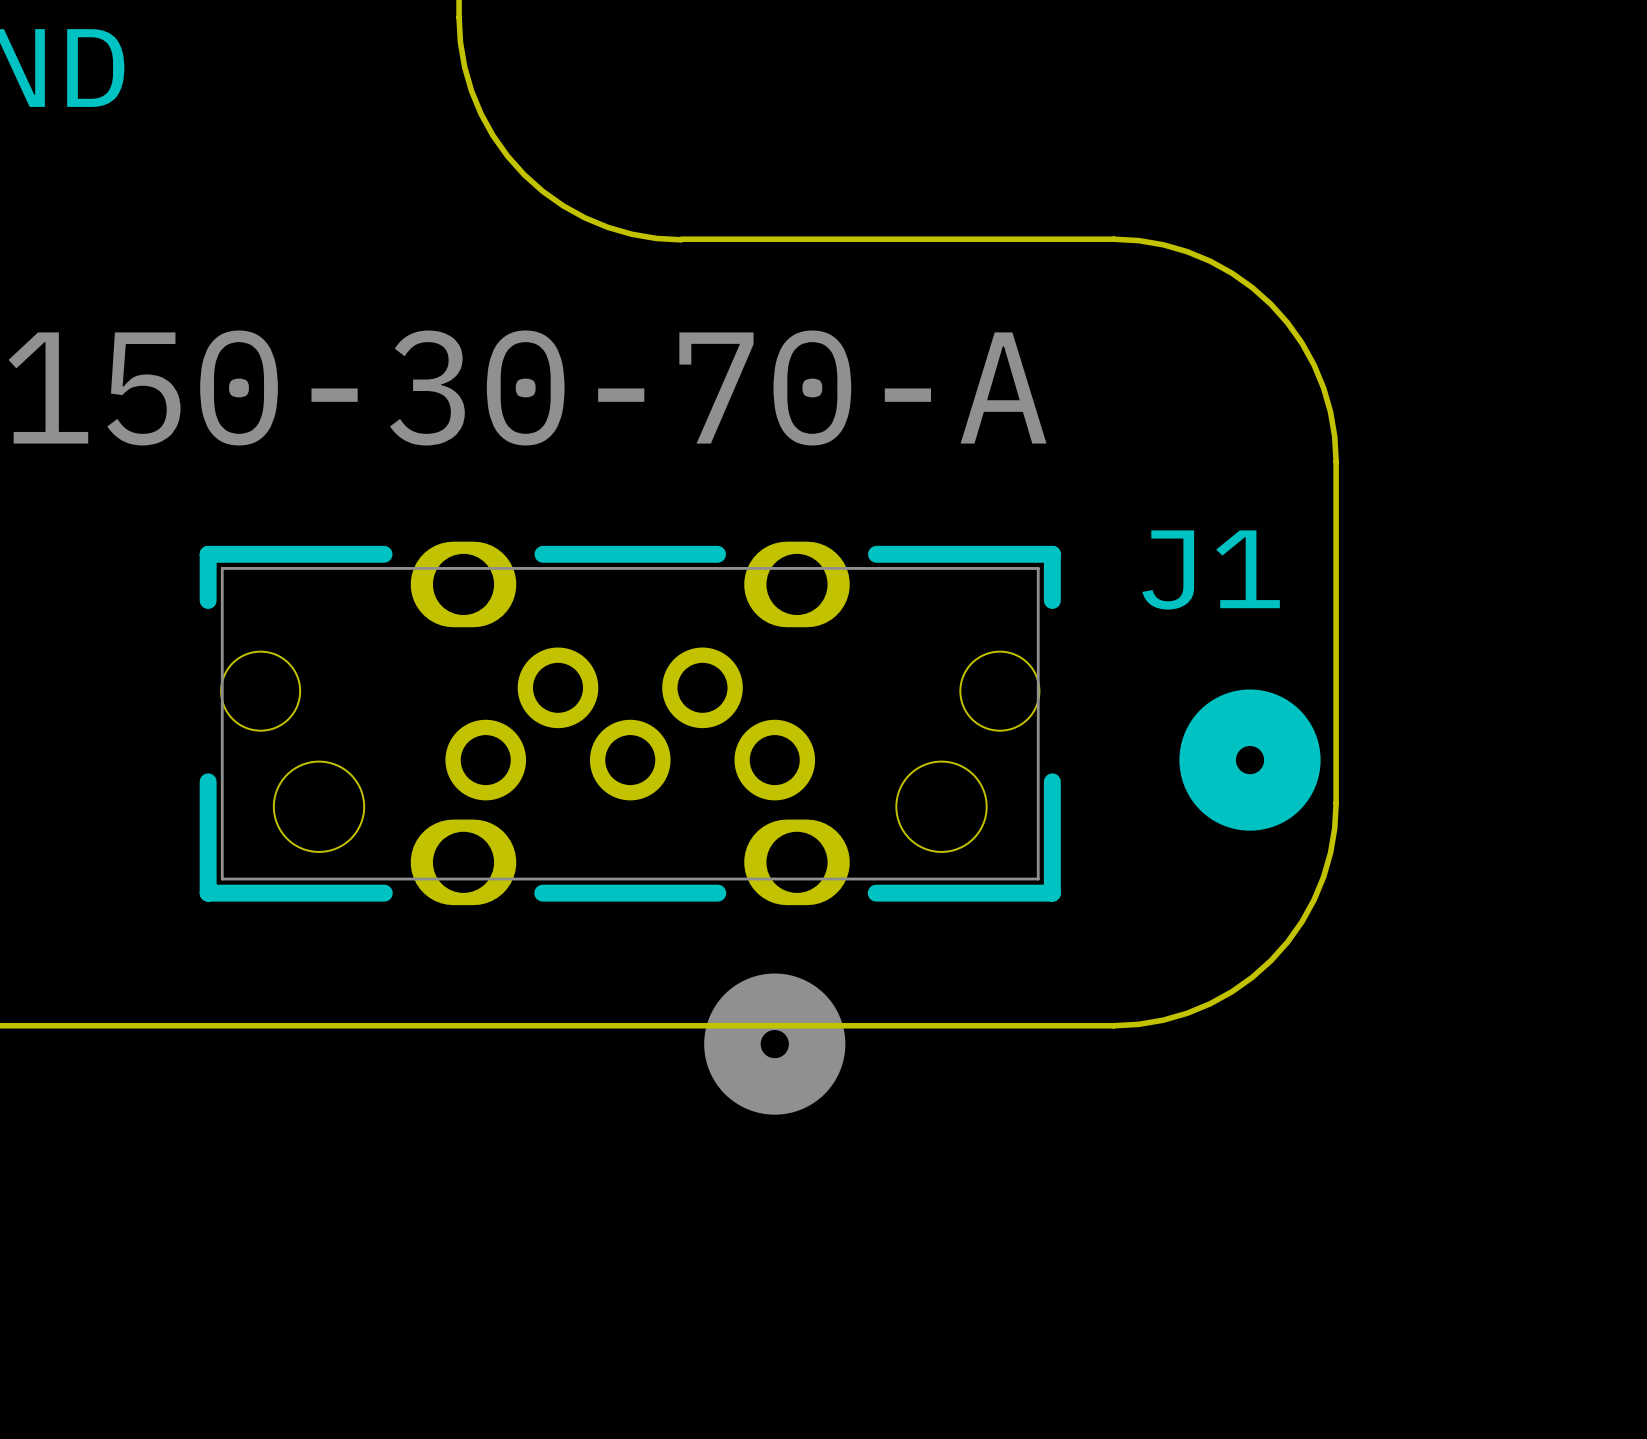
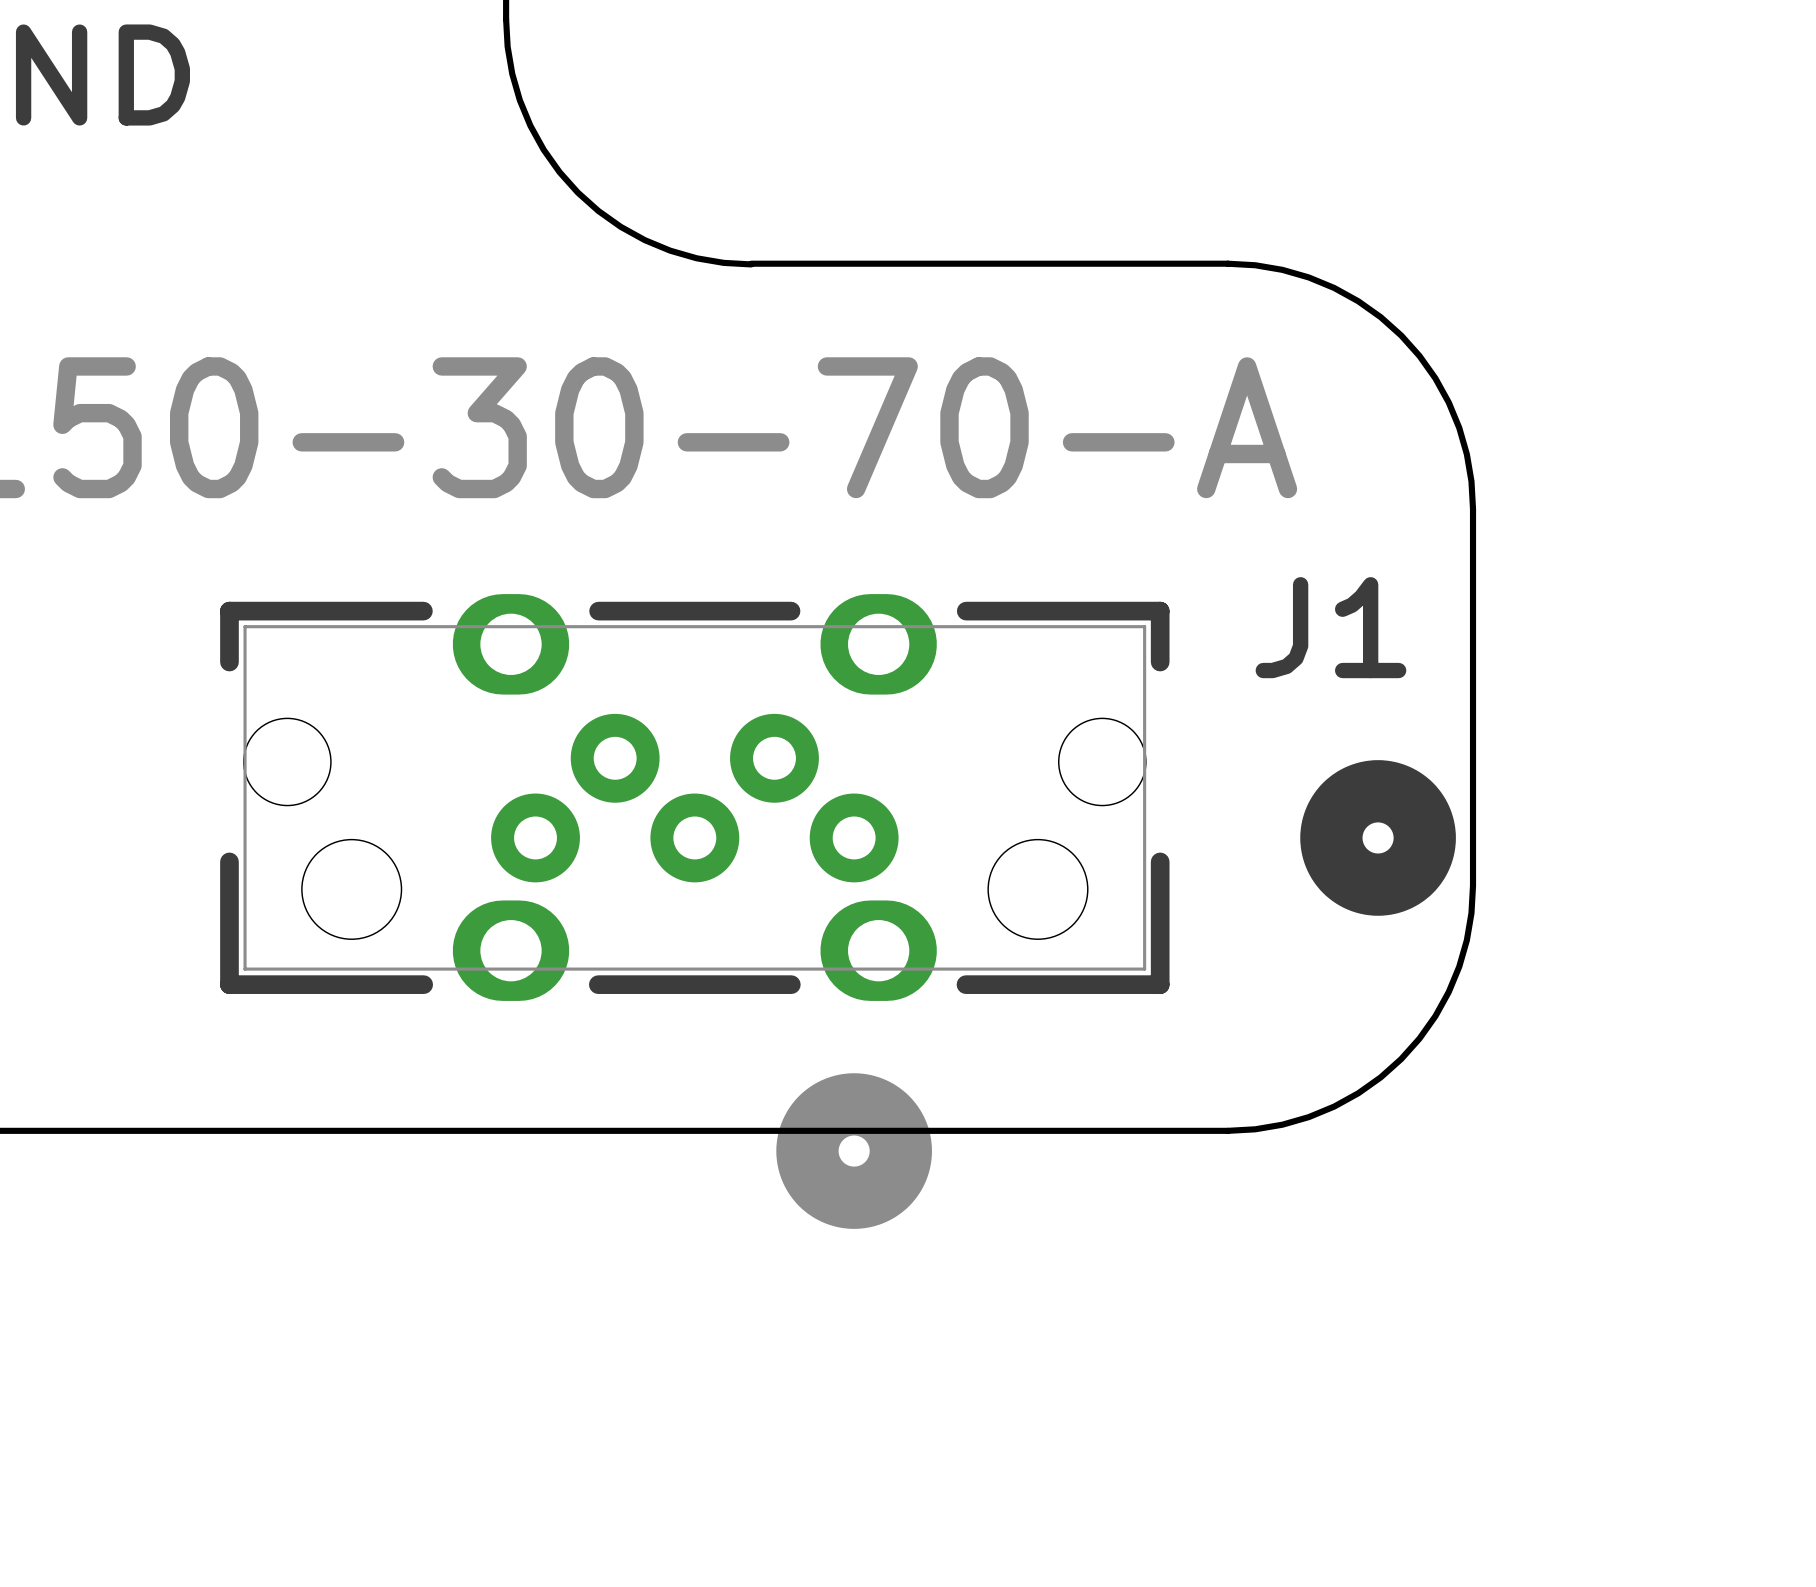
J1 footprint: [199, 541, 1321, 1115] -> [220, 594, 1456, 1229]

